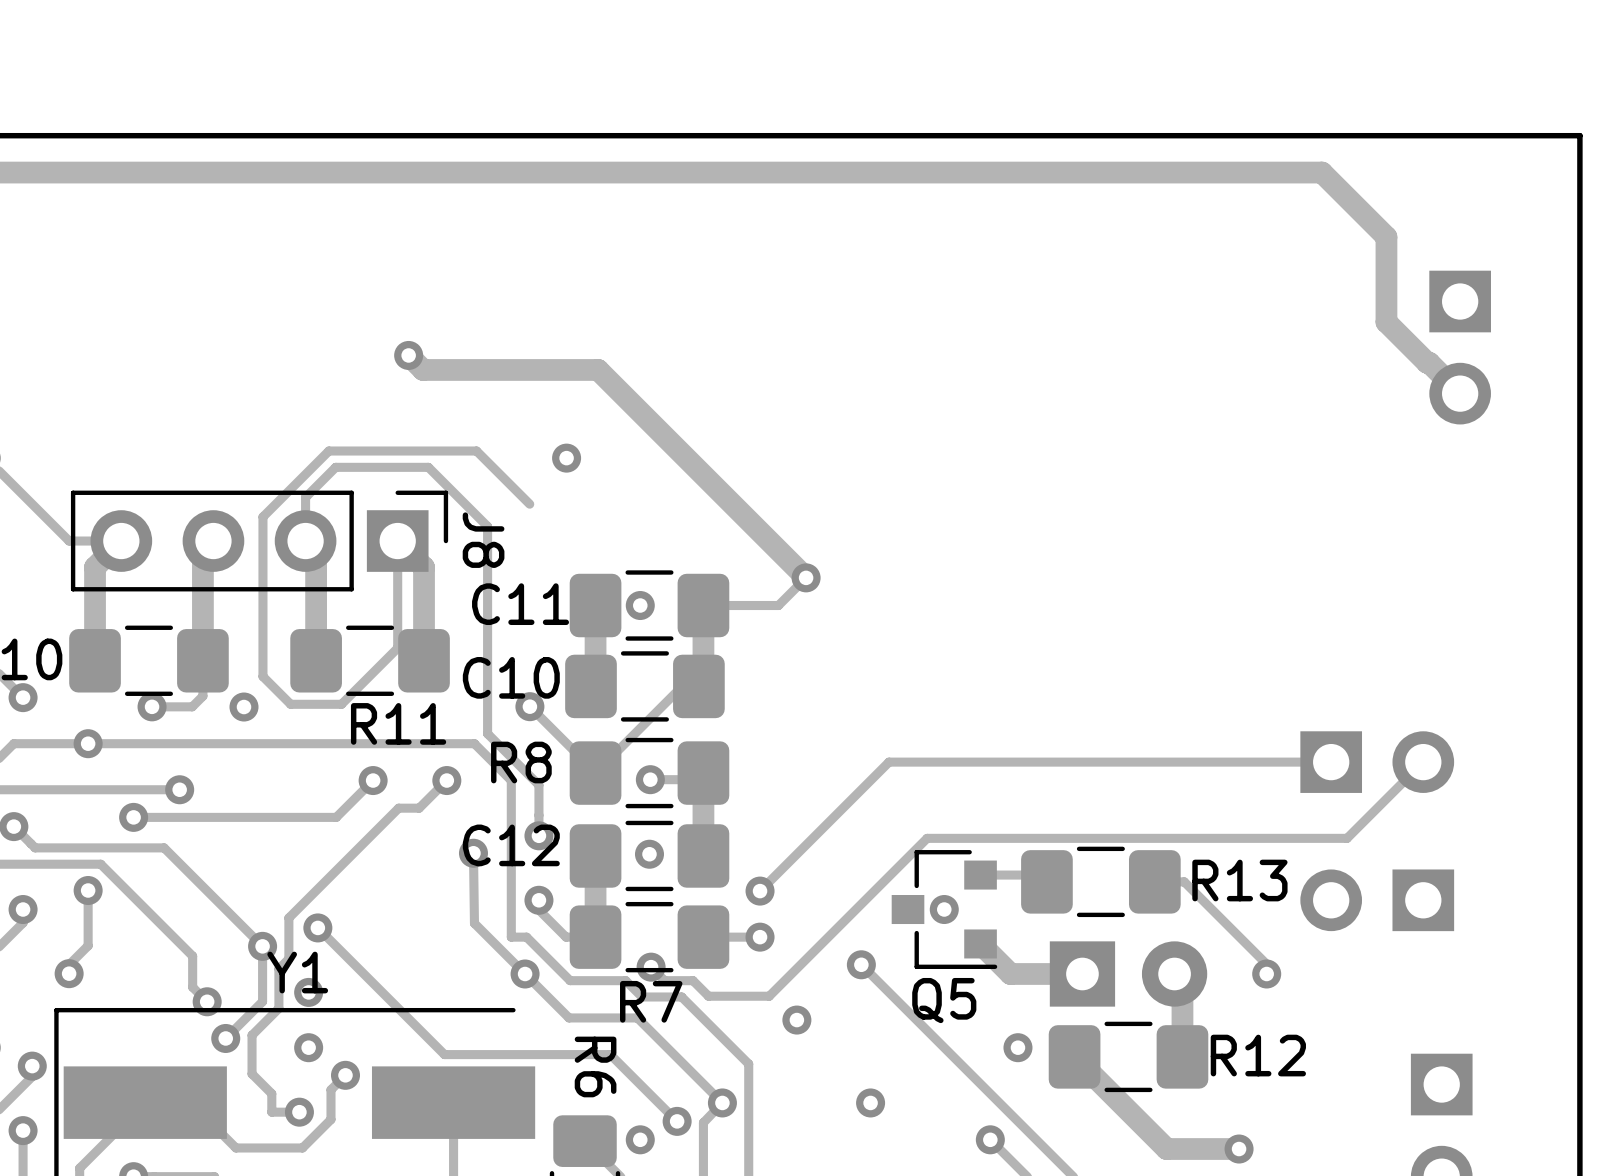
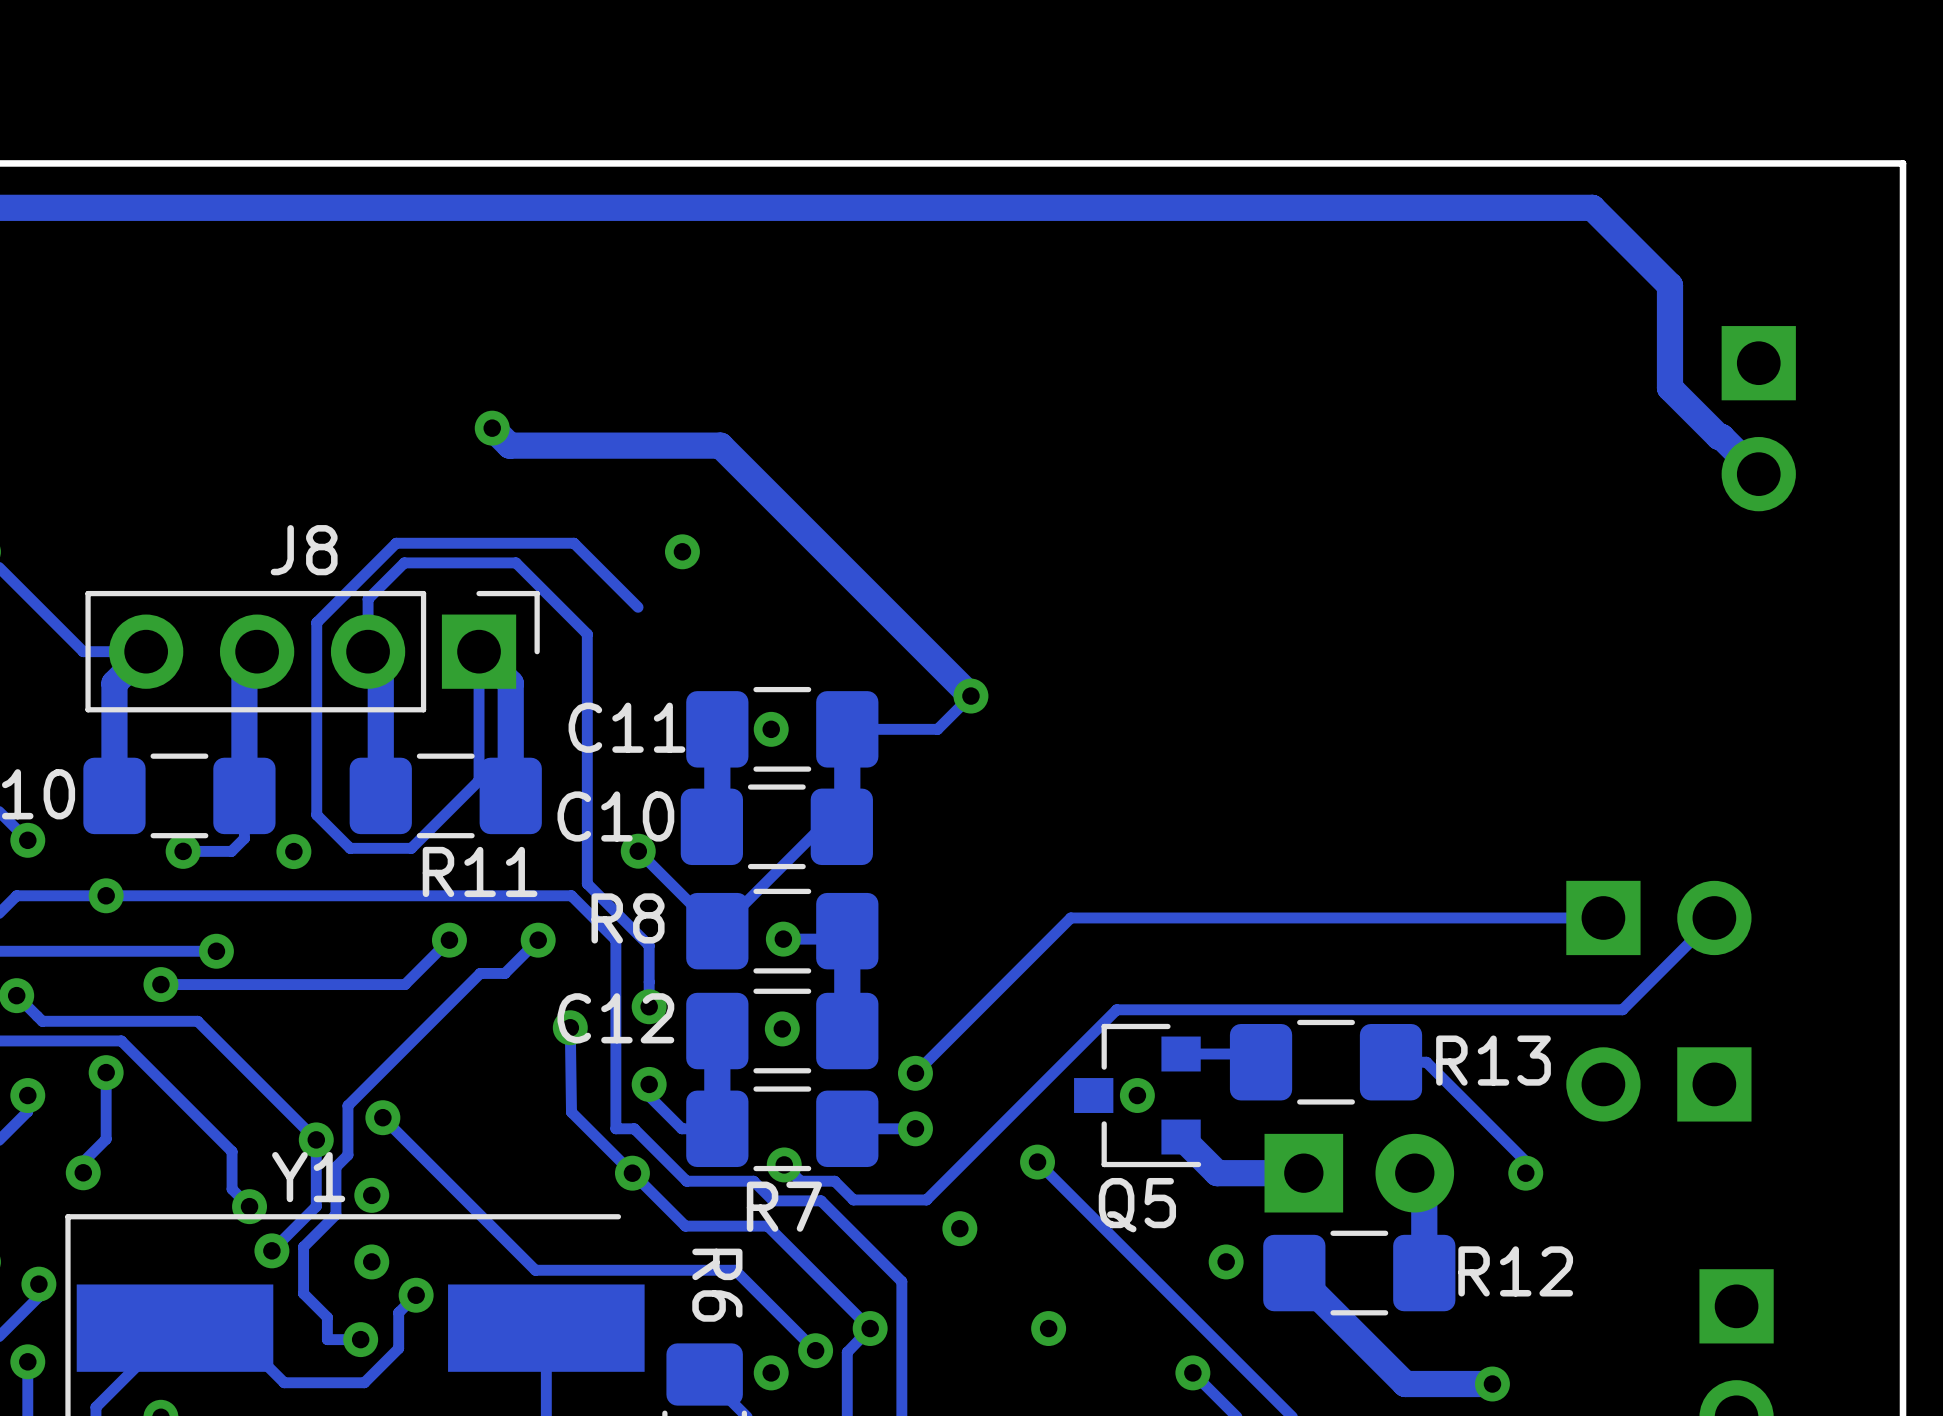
J8 name rotation: 0° (483, 540) -> 90° counterclockwise (304, 550)
J8 name position: J8 (483, 540) -> J8 (304, 550)
Y1 name position: Y1 (297, 972) -> Y1 (308, 1177)

